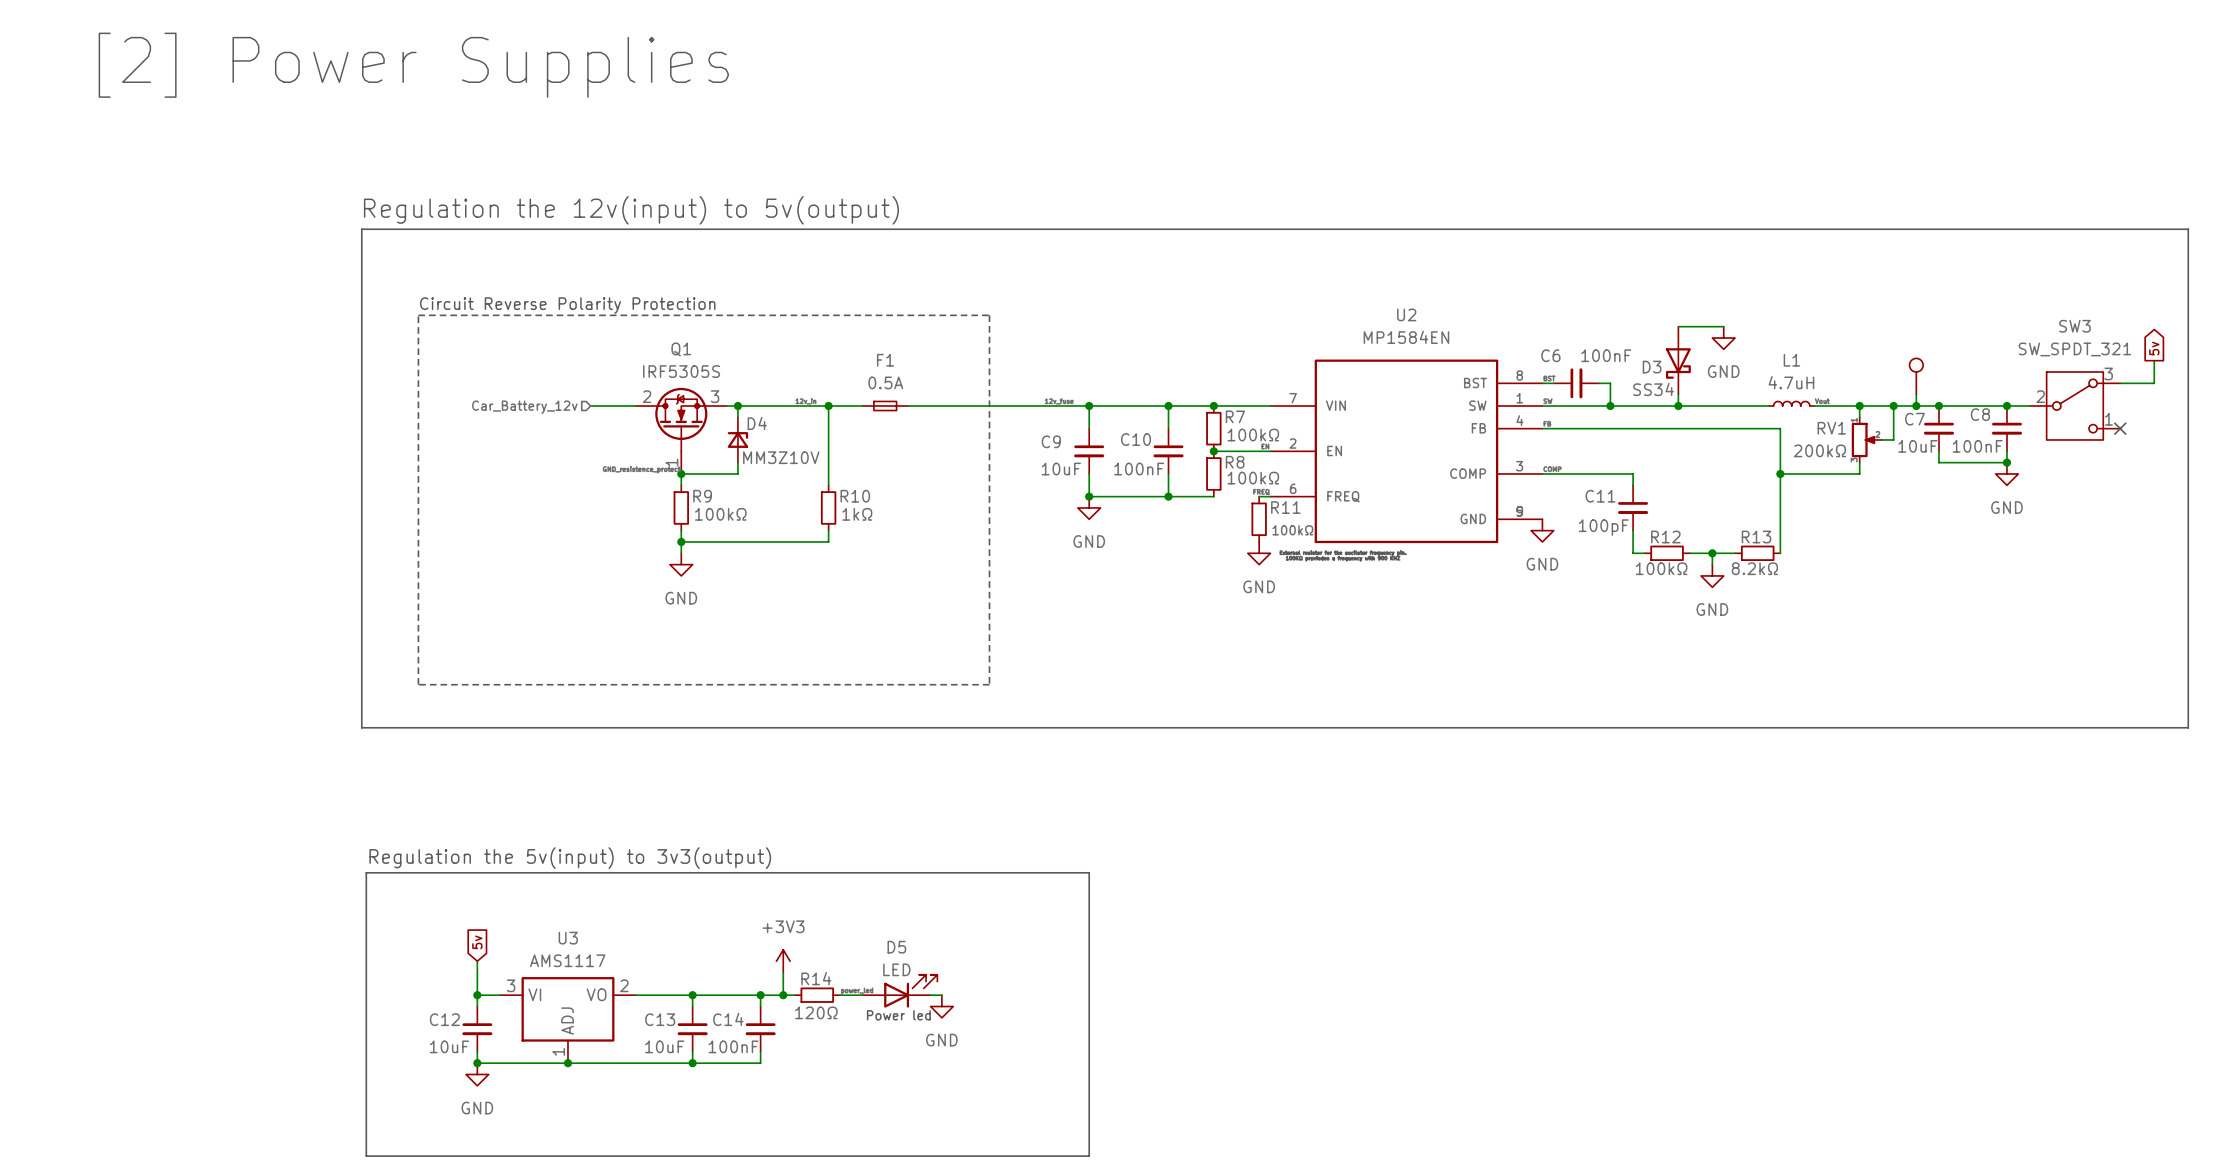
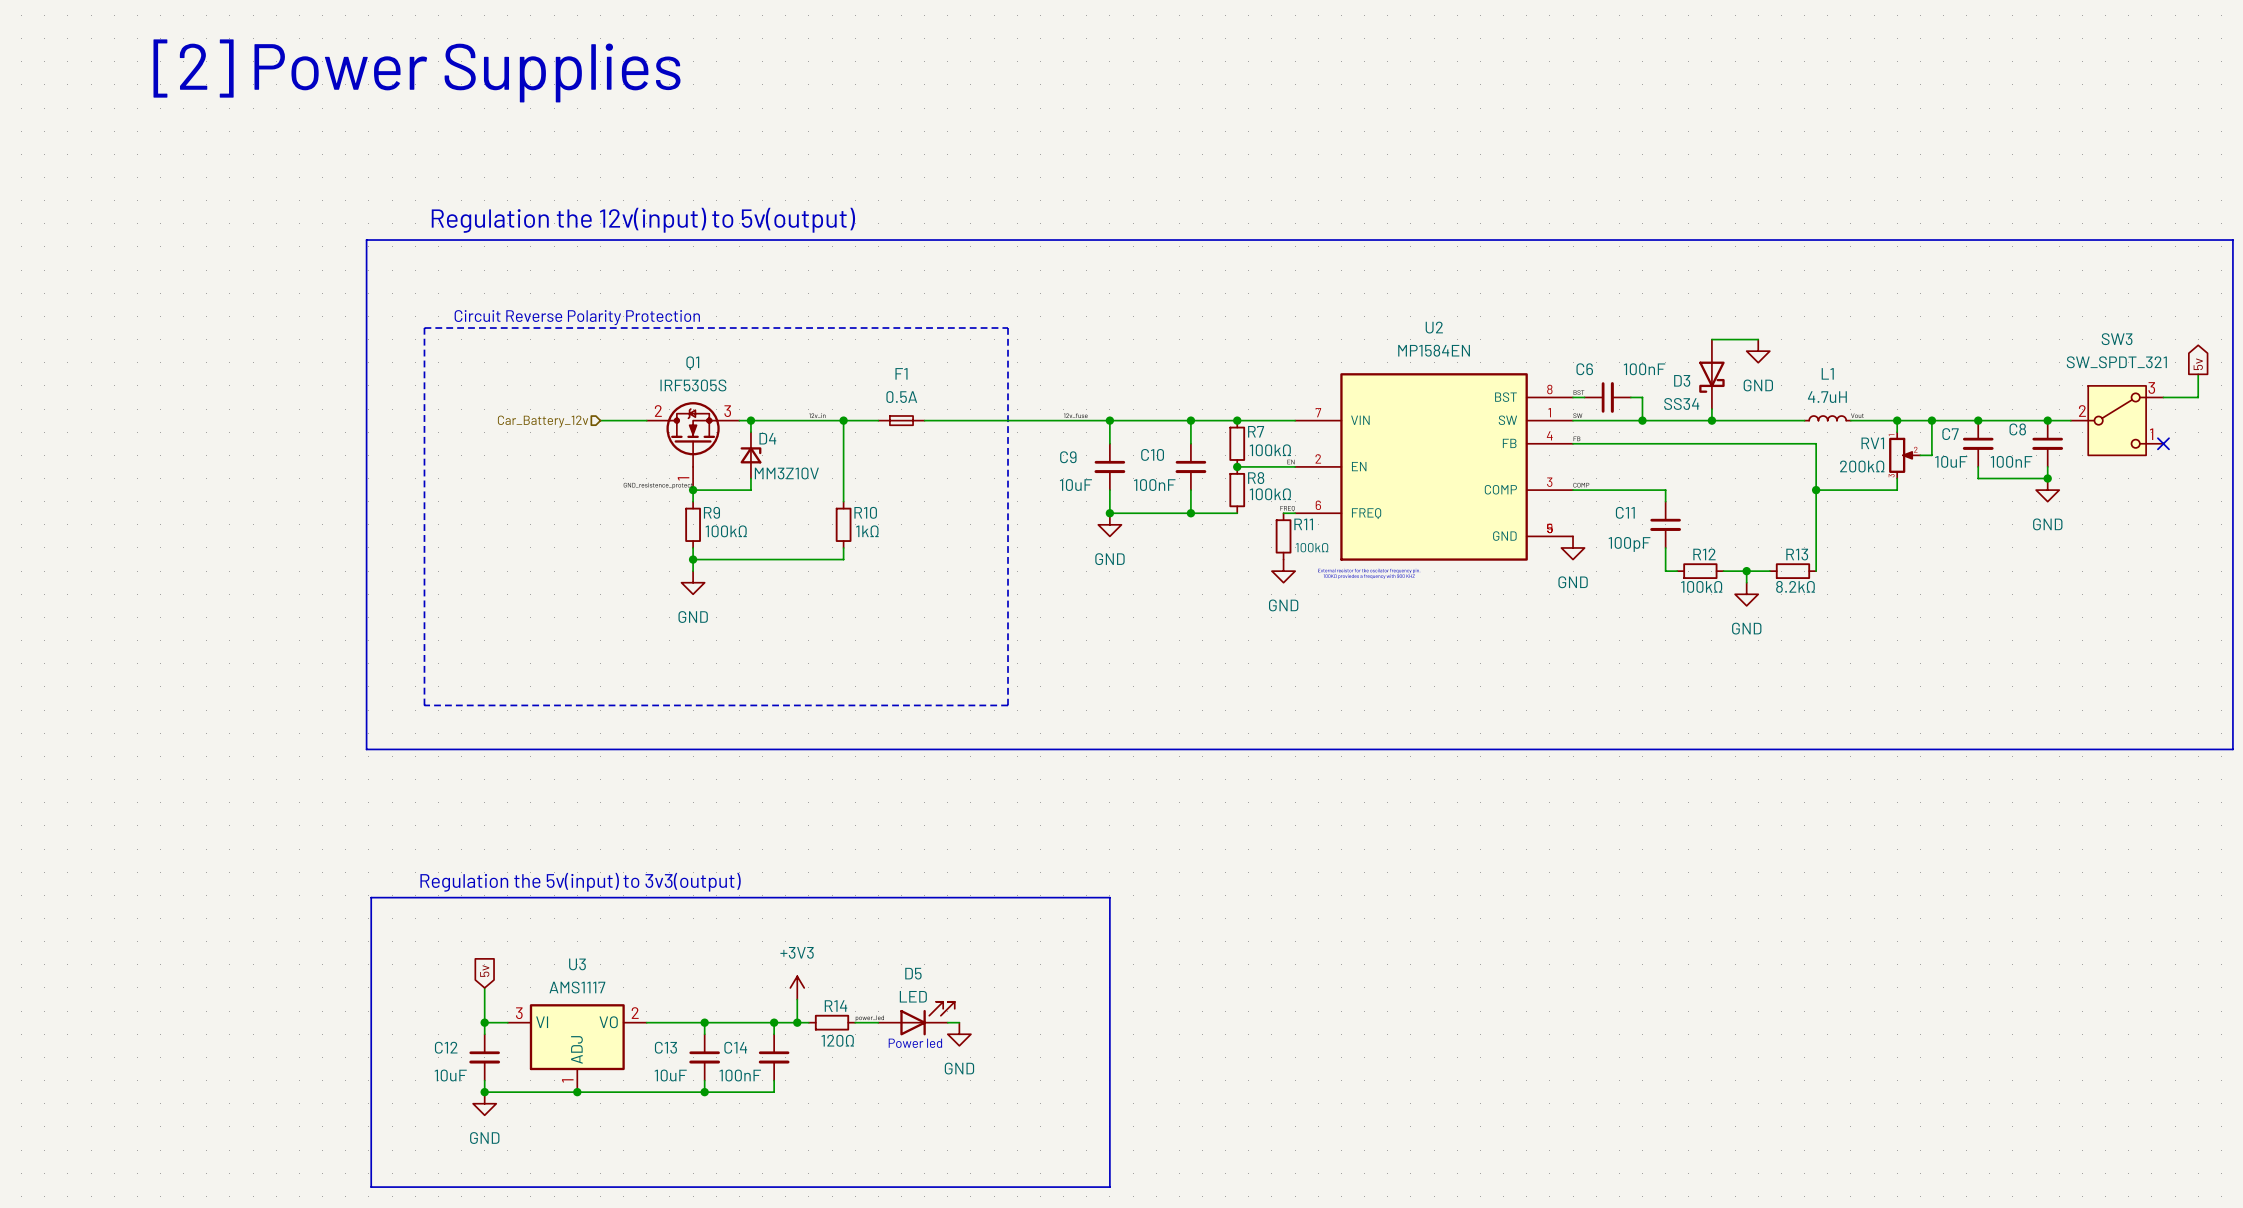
part: (1916, 376) -> none
wire: (1916, 394) (1916, 405) -> none
junction: (1916, 405) -> none

